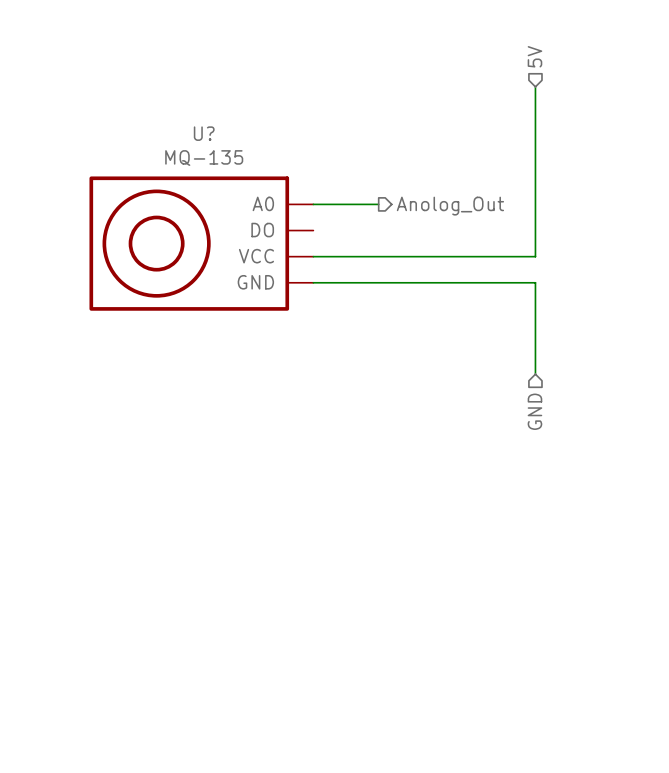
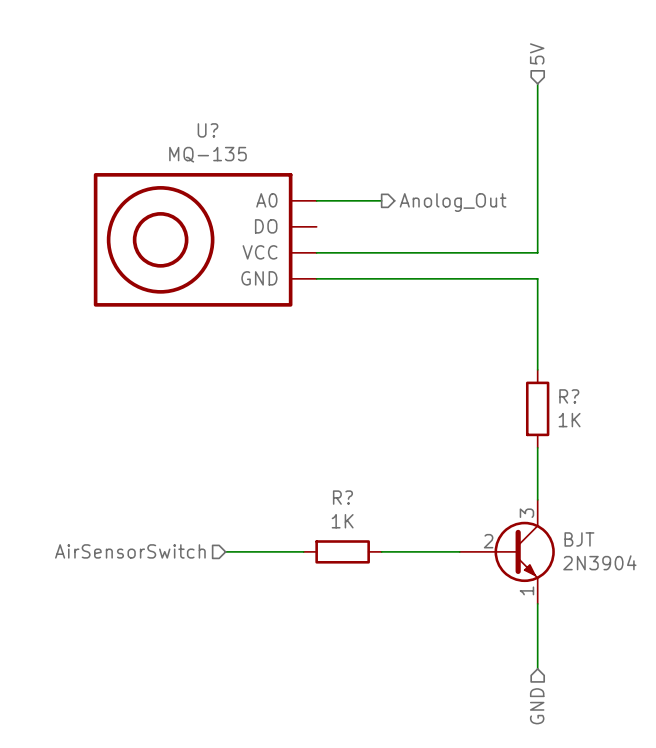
hierarchical label: GND (534, 411) -> none
R?: none -> 1K (537, 408)
wire: none -> (537, 447) (537, 499)
hierarchical label: none -> AirSensorSwitch (130, 551)
wire: none -> (225, 551) (303, 551)
R?: none -> 1K (342, 551)
wire: none -> (381, 551) (459, 551)
BJT: none -> 2N3904 (507, 551)
wire: none -> (537, 603) (537, 668)
hierarchical label: none -> GND (537, 706)

